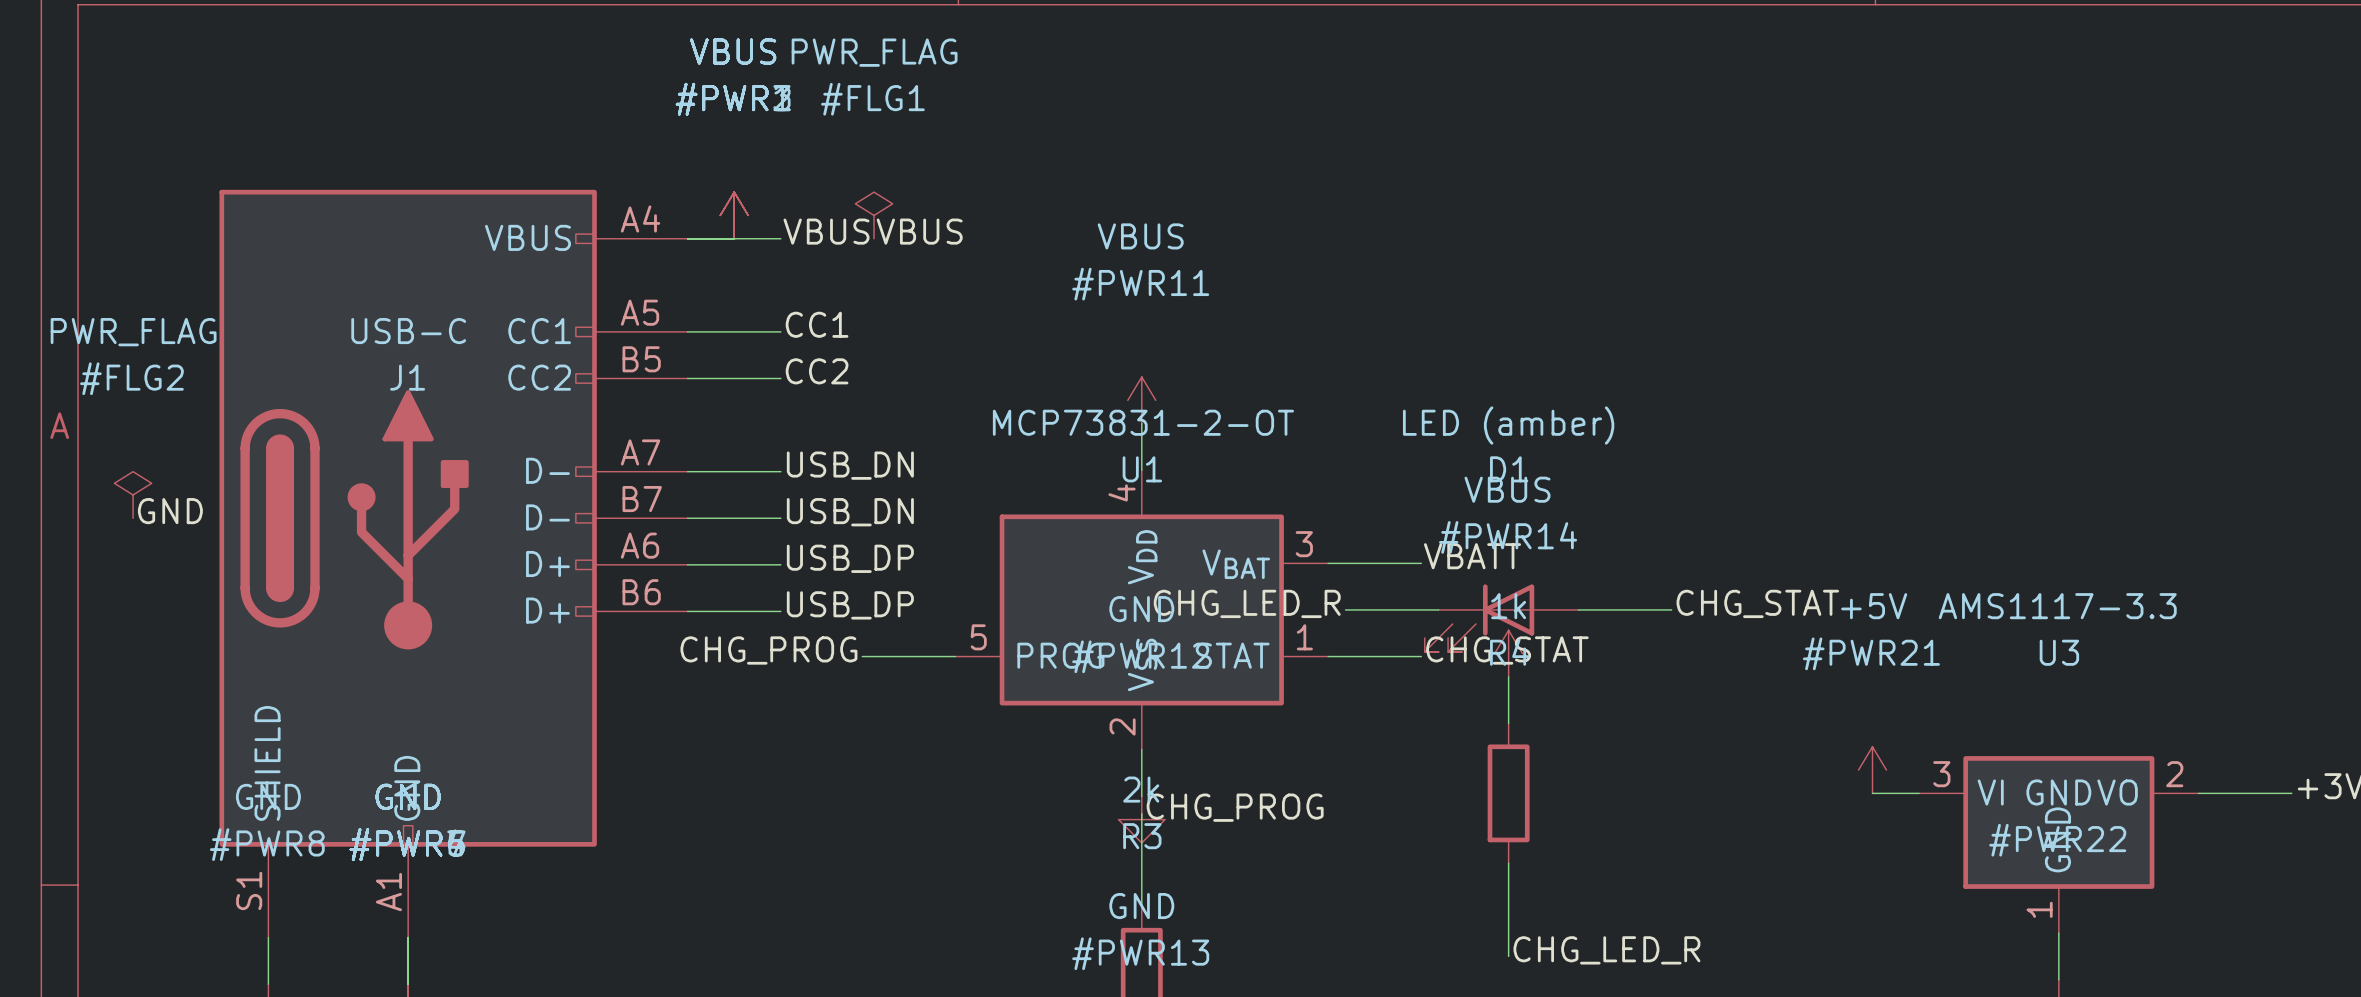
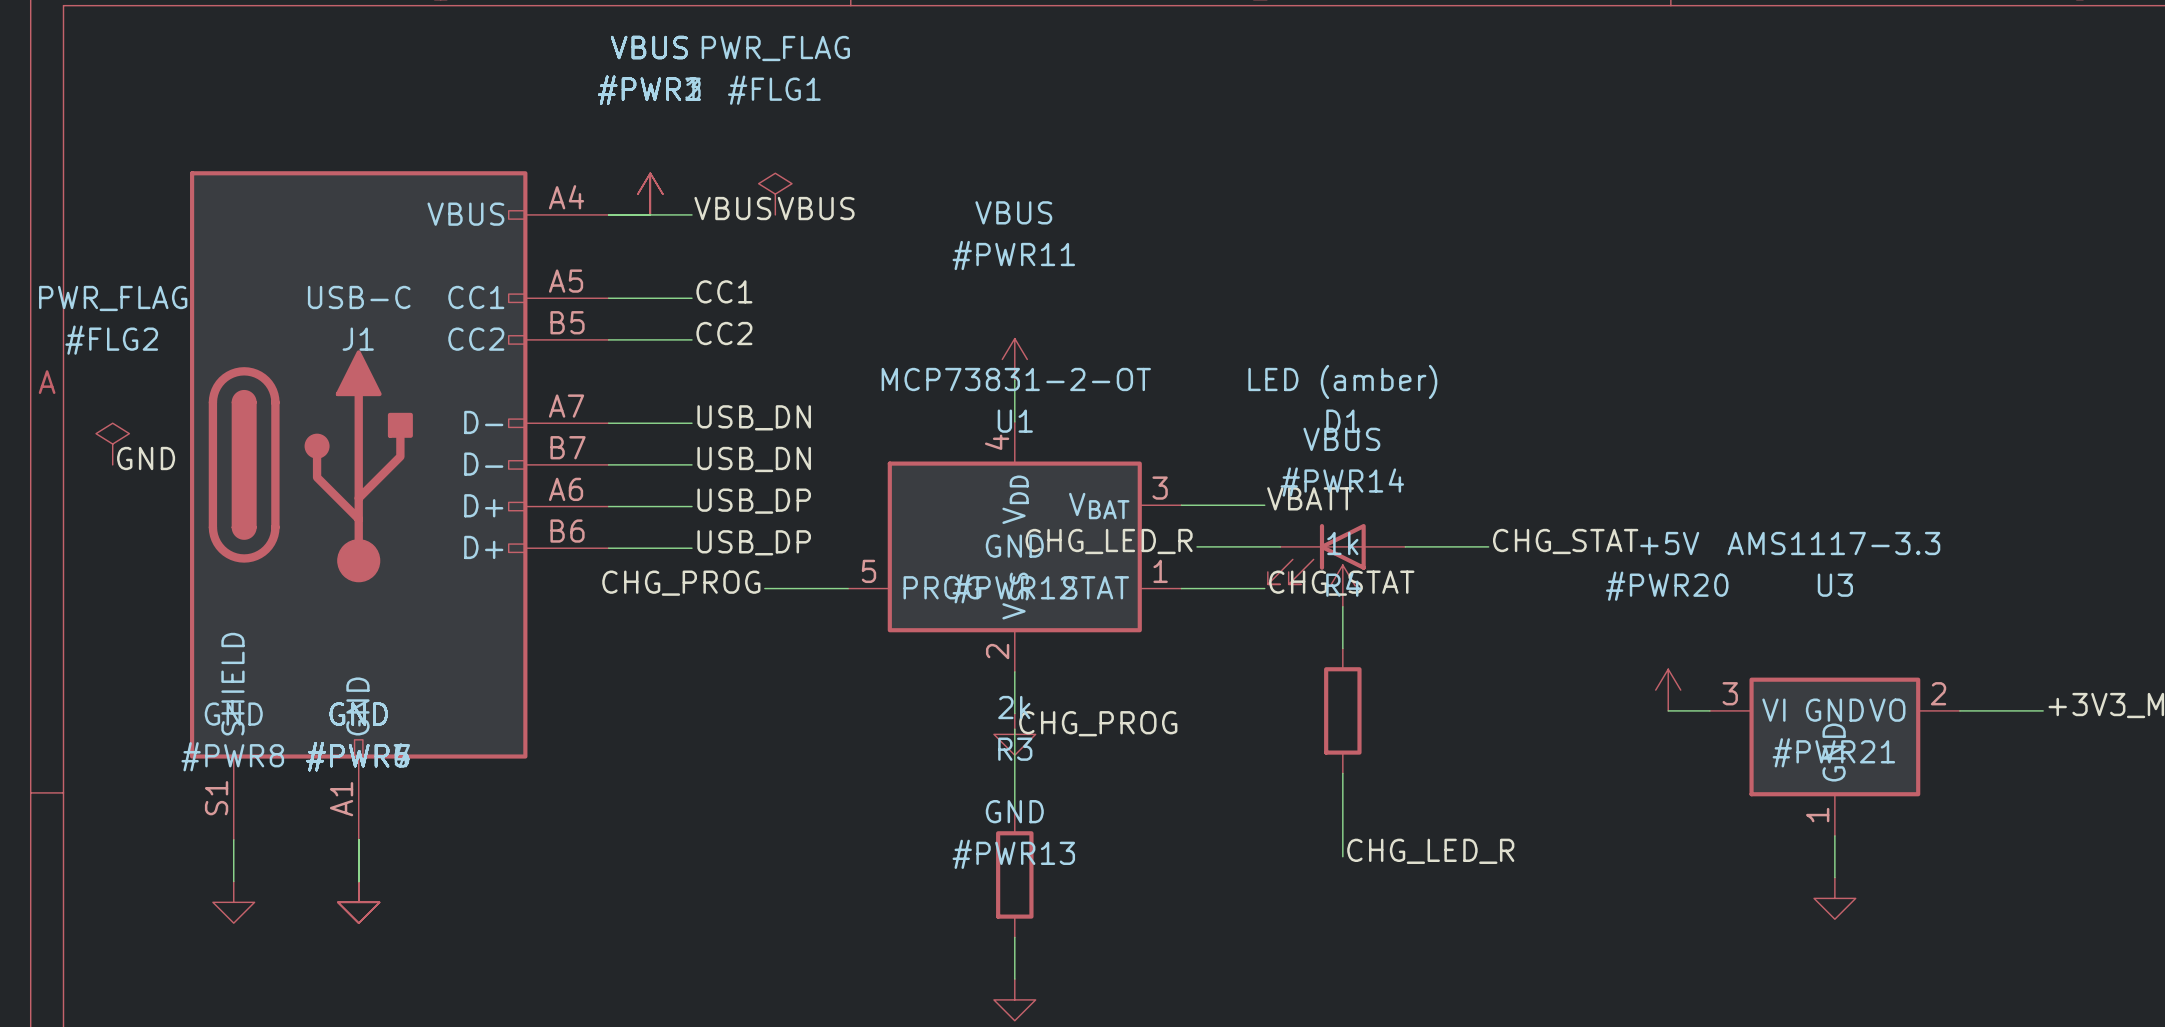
#PWR21 name: #PWR21 (1871, 653) -> #PWR20 (1667, 586)
#PWR22 name: #PWR22 (2057, 840) -> #PWR21 (1833, 752)

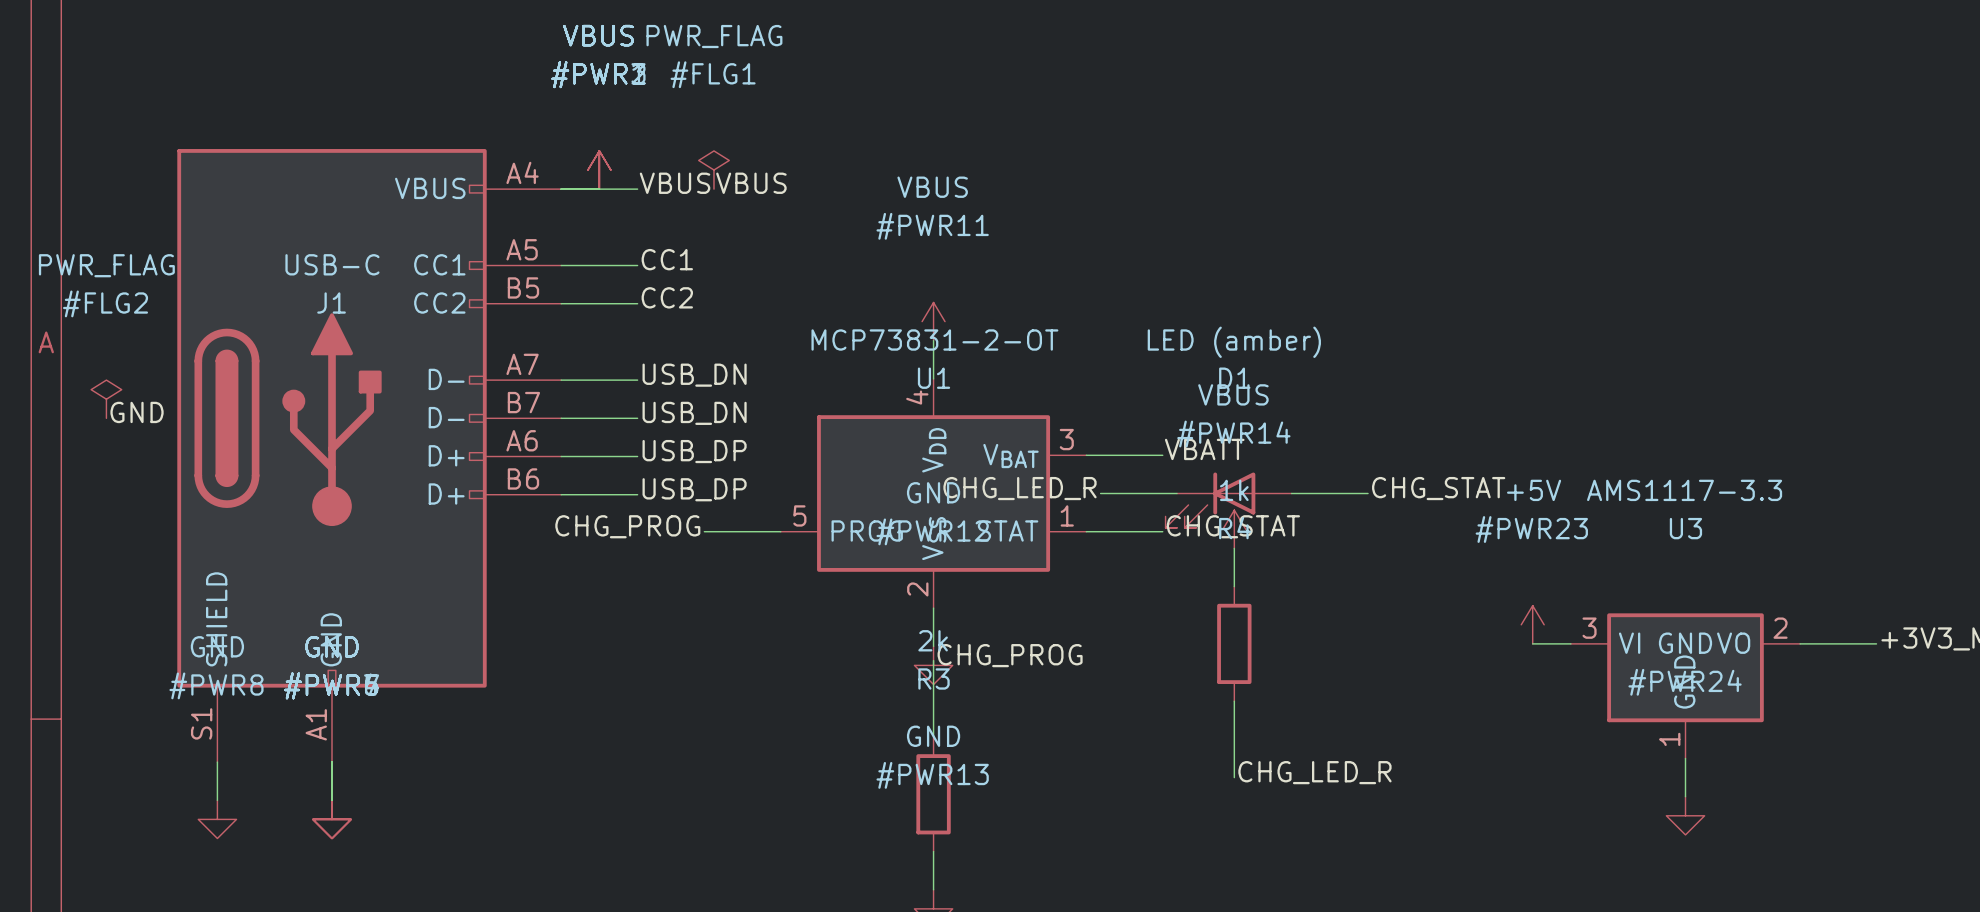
#PWR20 name: #PWR20 (1667, 586) -> #PWR23 (1531, 529)
#PWR21 name: #PWR21 (1833, 752) -> #PWR24 (1685, 682)

